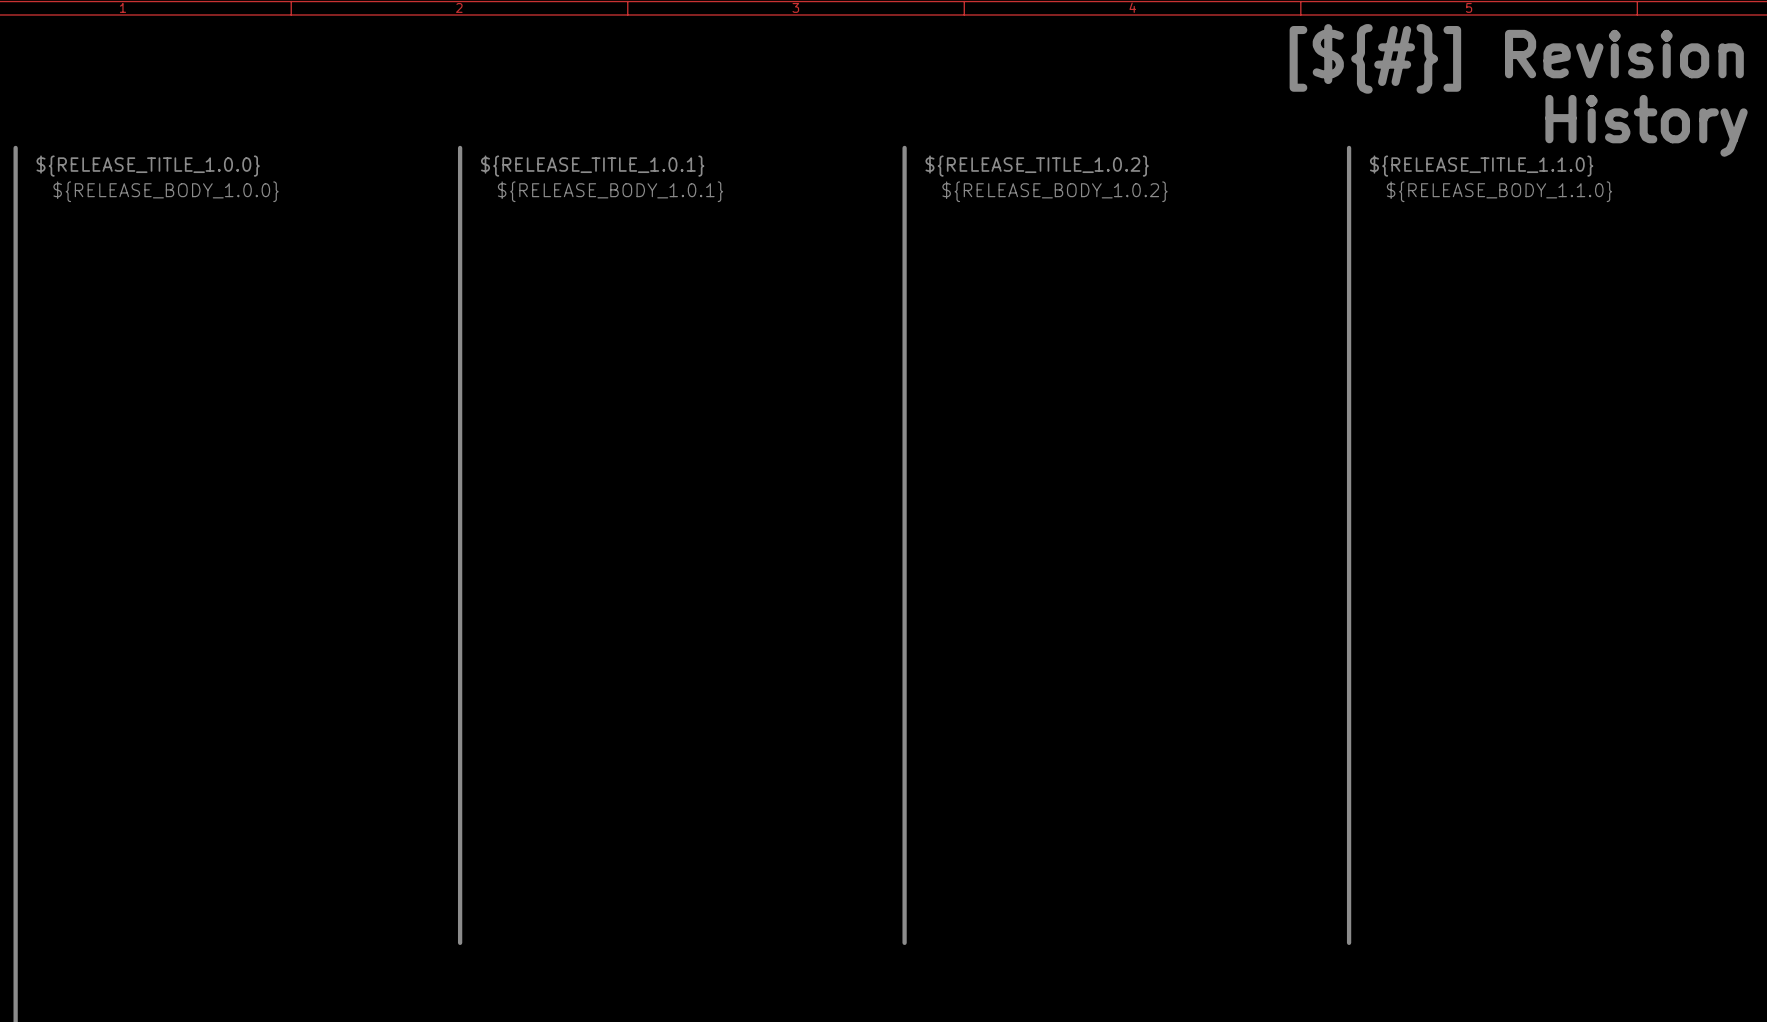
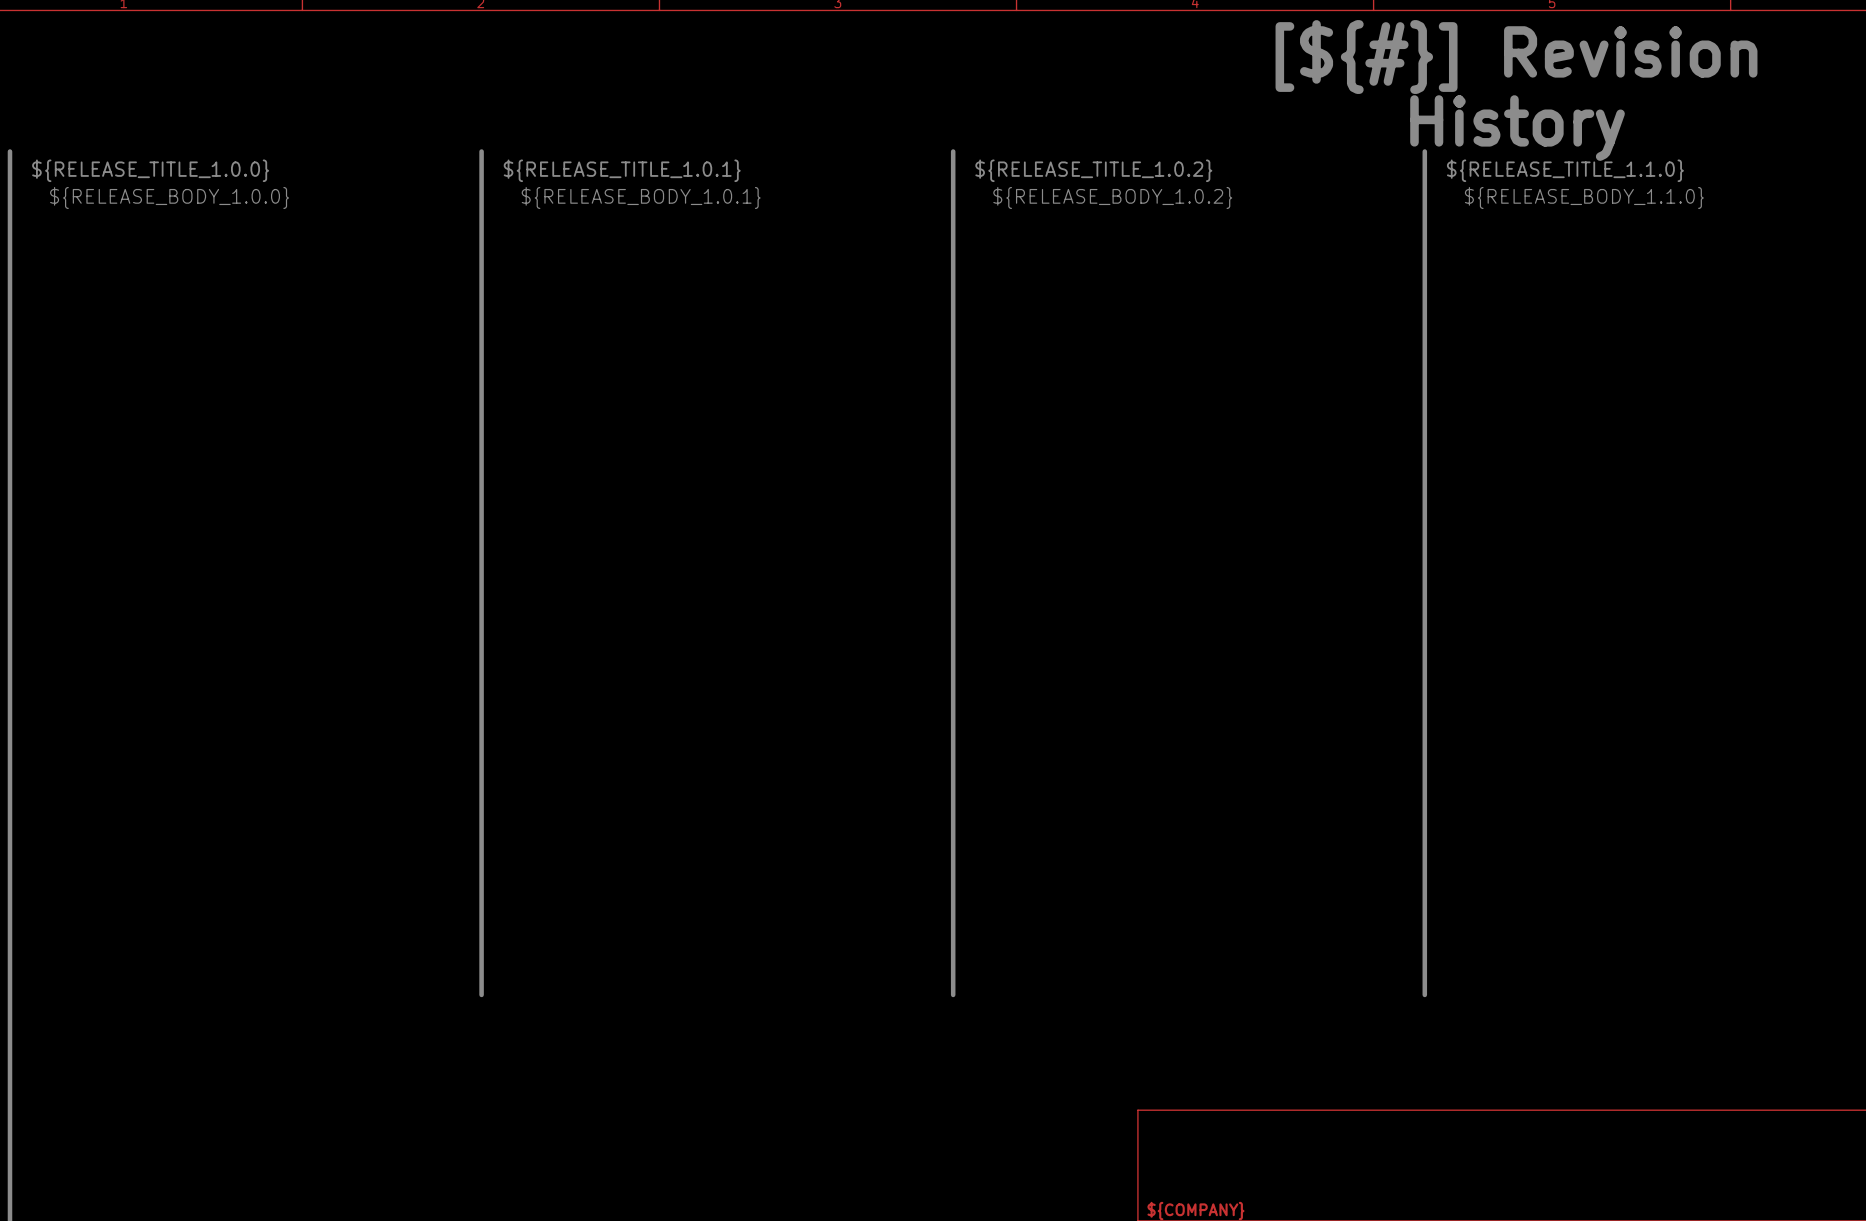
text: none -> [${#}] Revision (1516, 57)
text: [${#}] Revision (1516, 58) -> none
text: none -> History (1517, 128)
text: History (1646, 125) -> none

